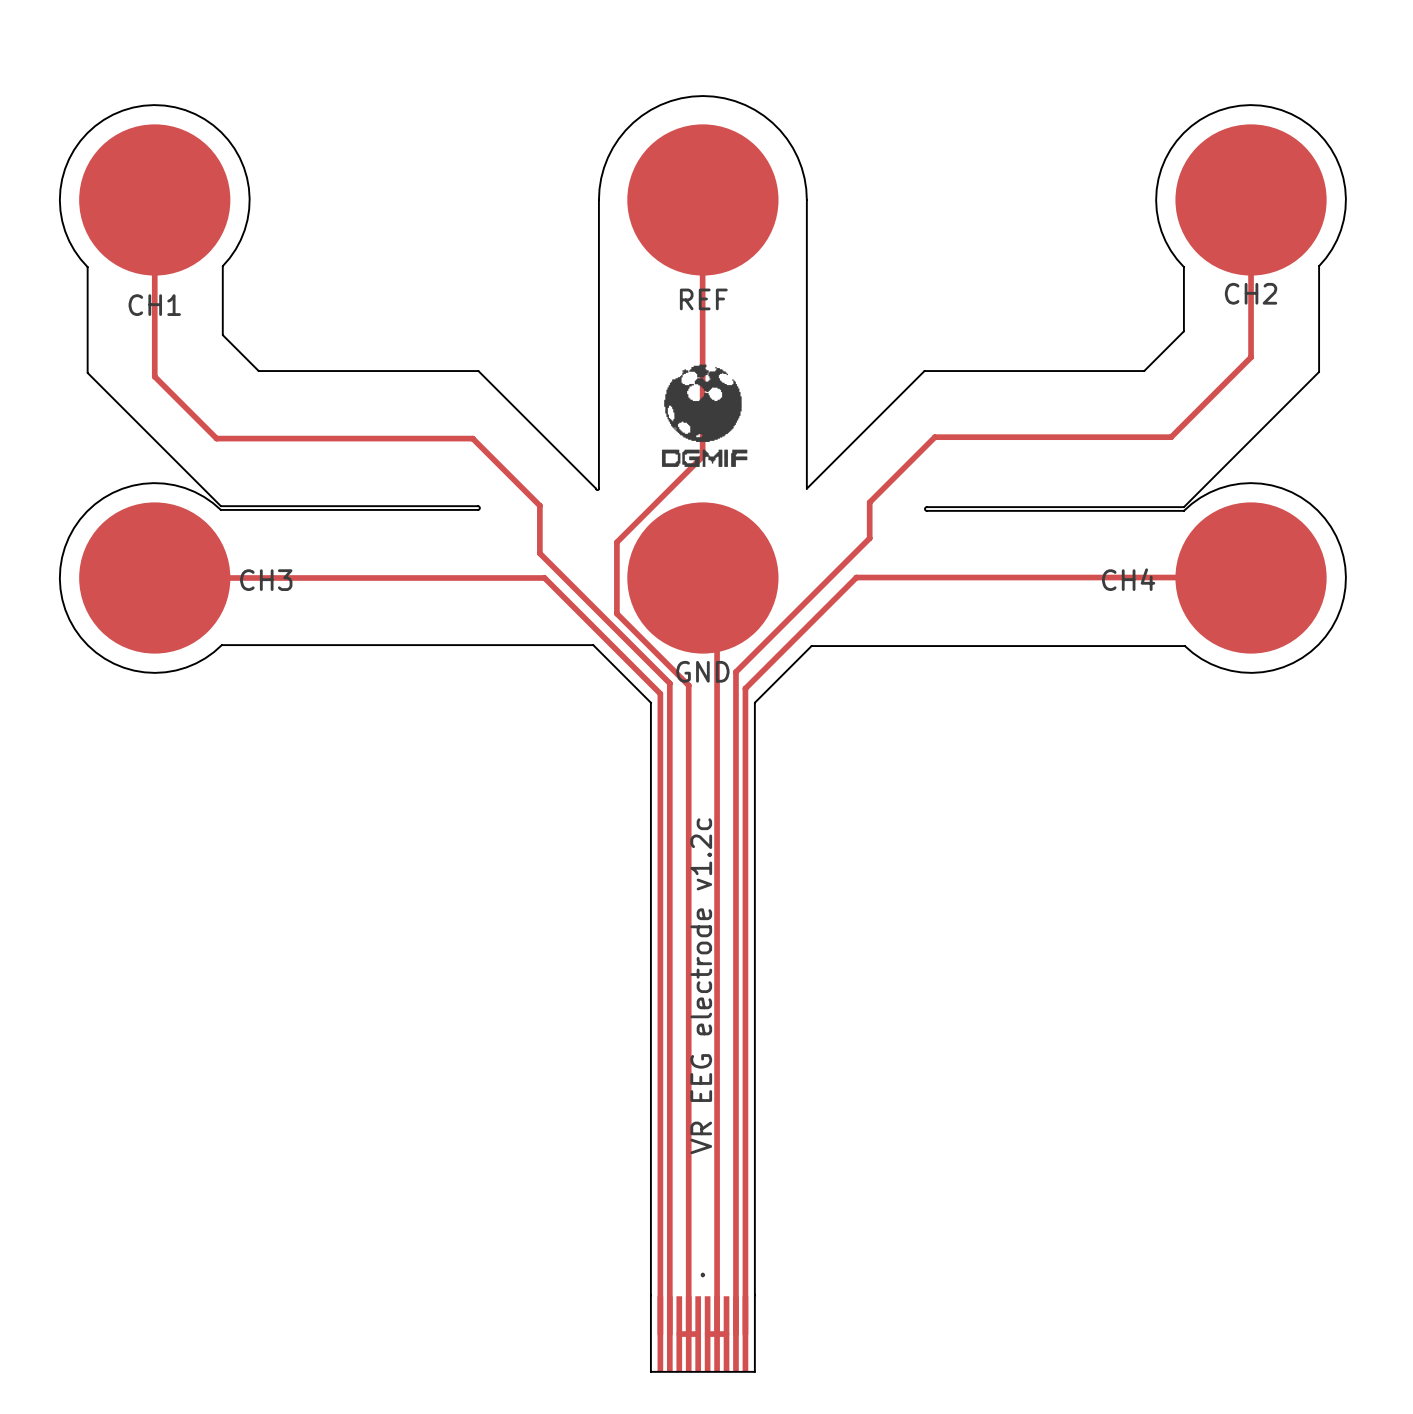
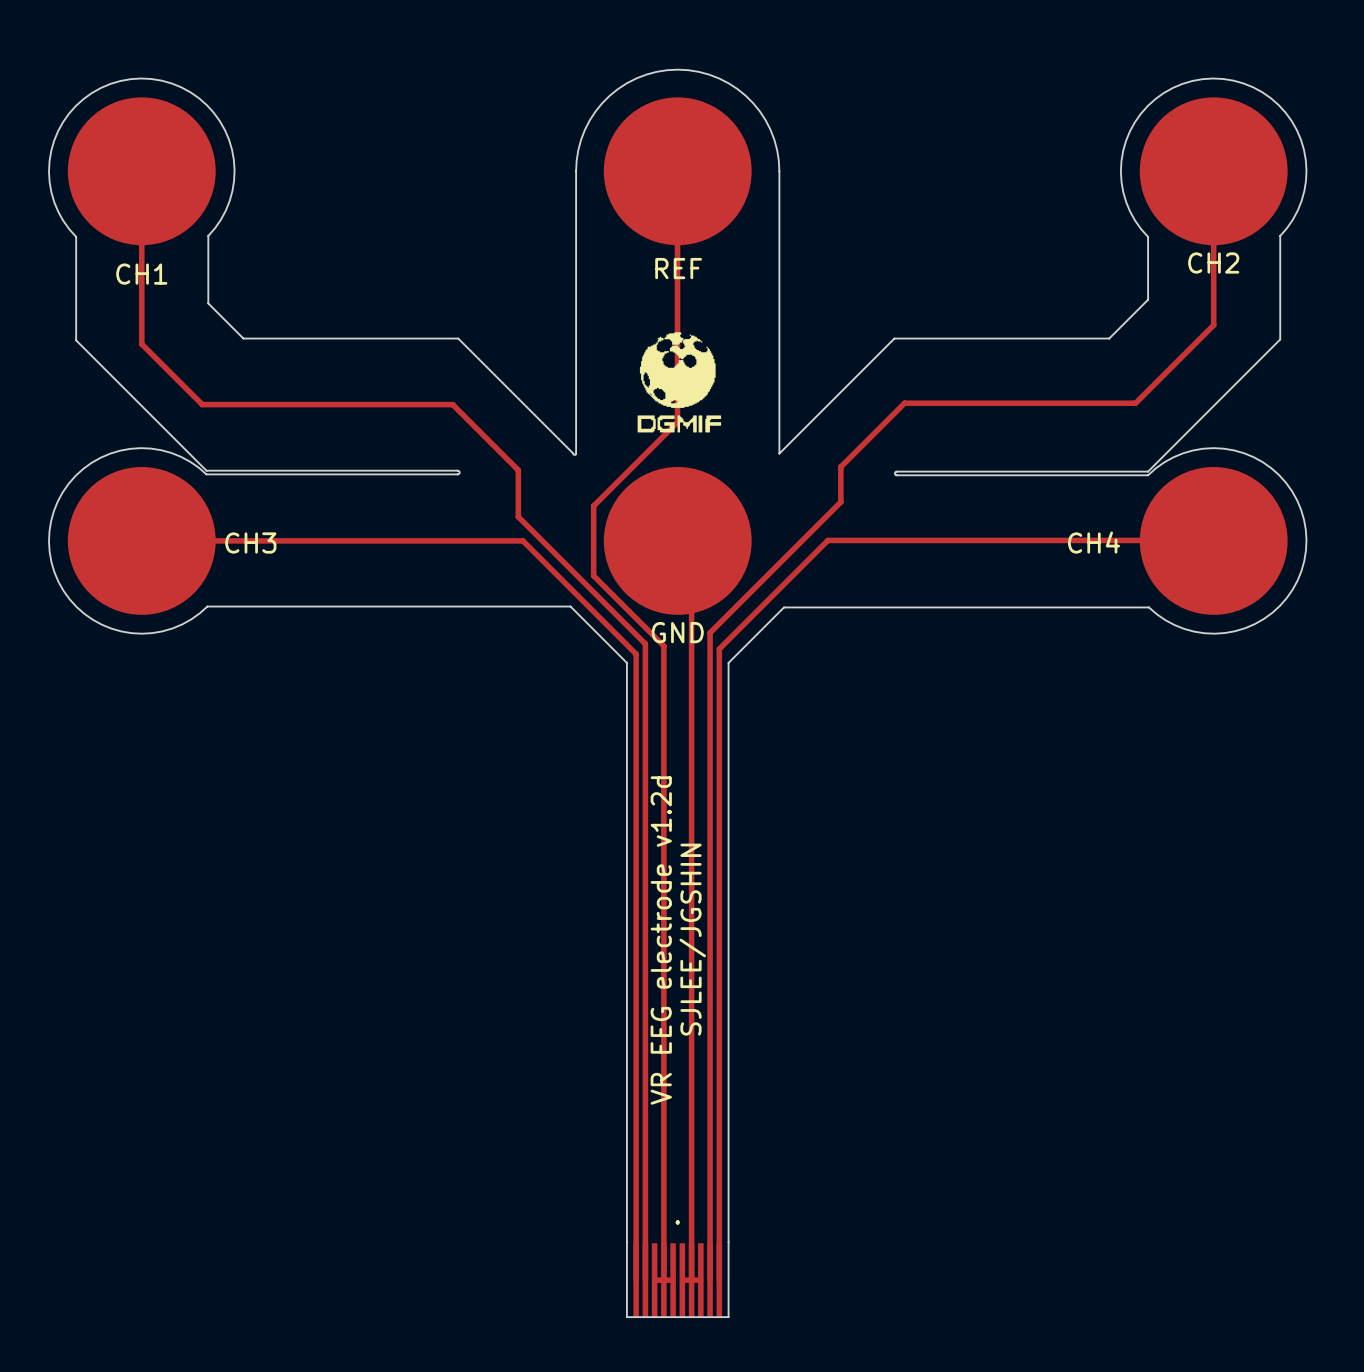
text: none -> SJLEE/JGSHIN (692, 939)
text: VR EEG electrode v1.2c (701, 986) -> VR EEG electrode v1.2d (661, 940)

